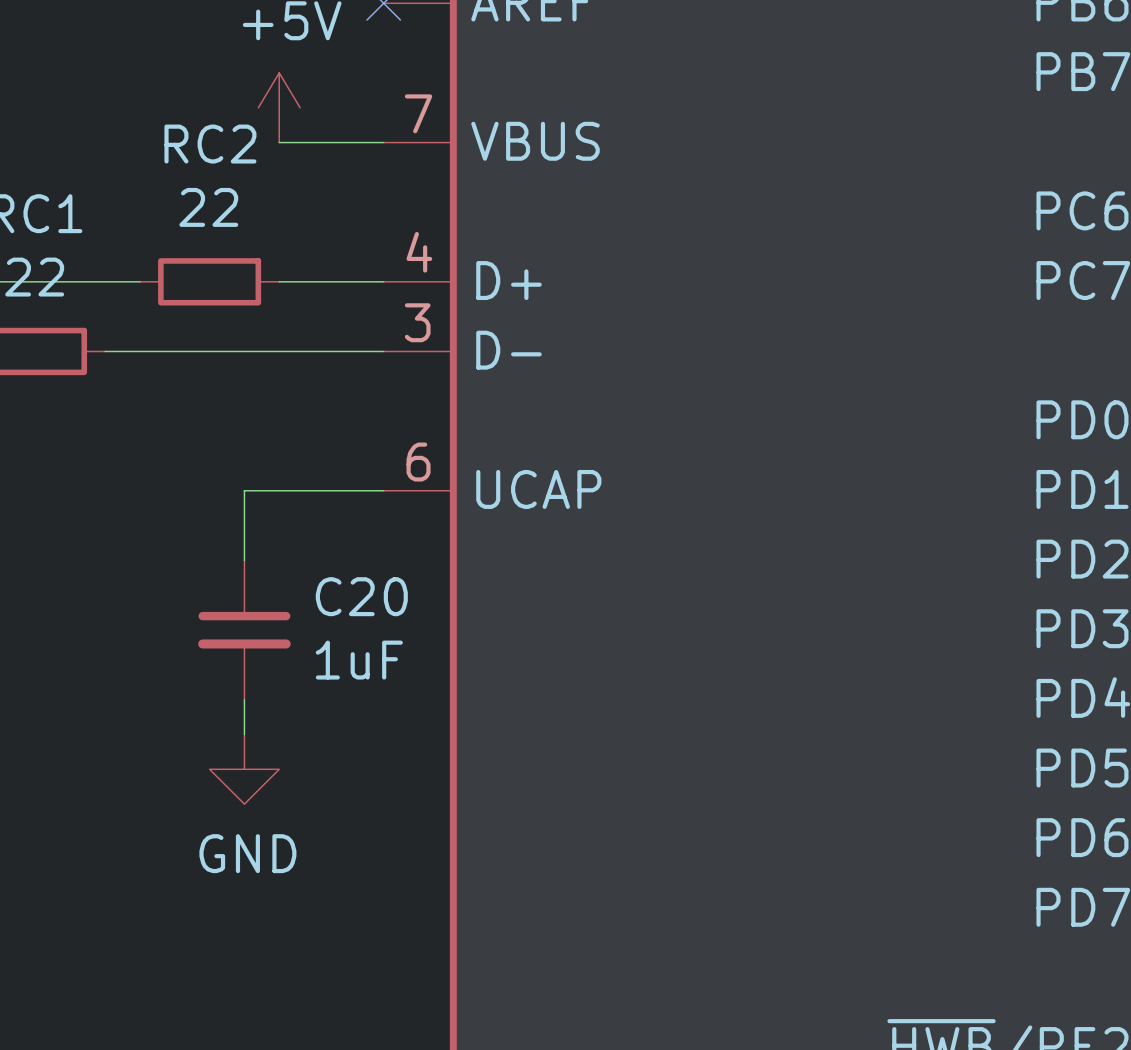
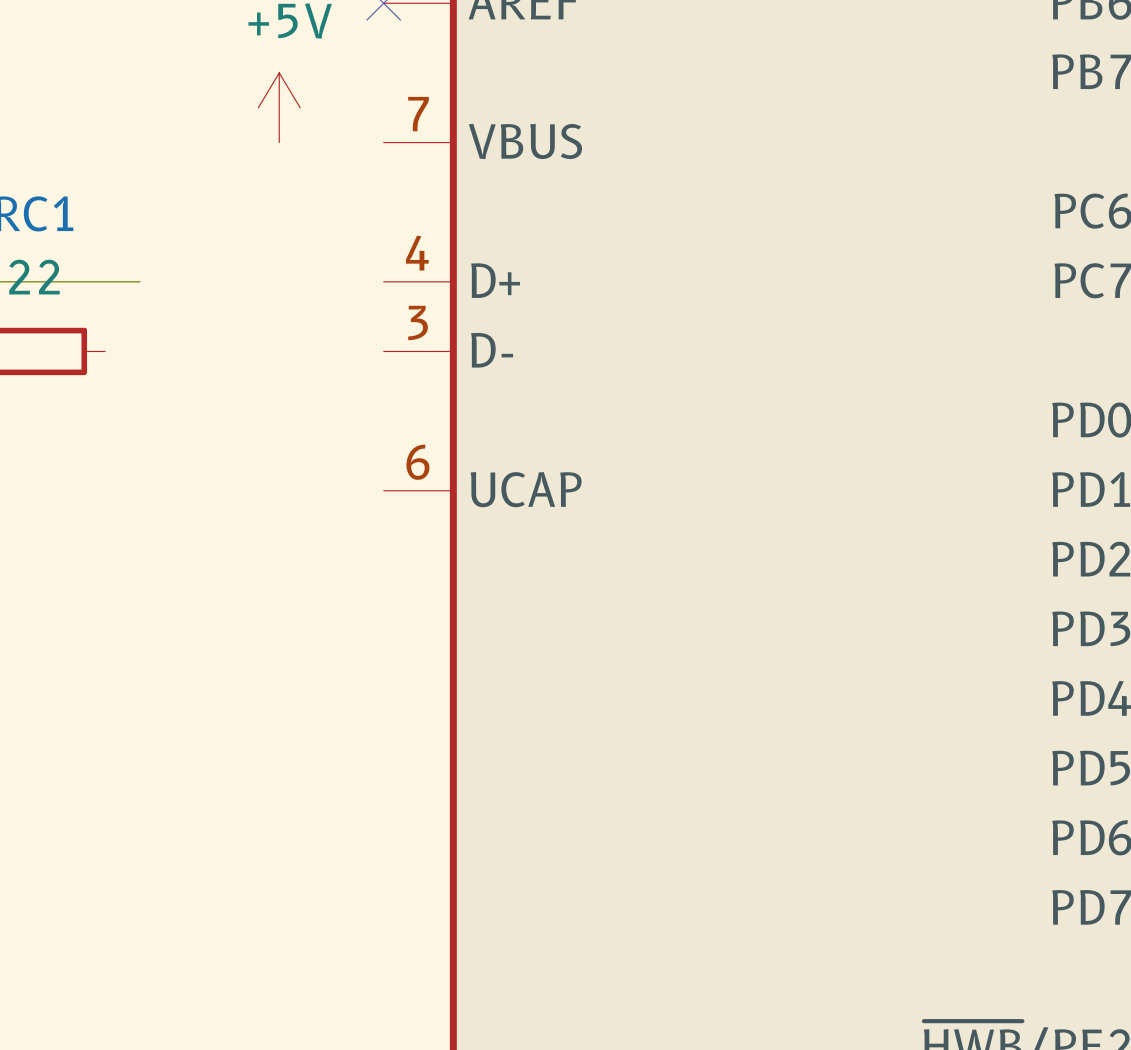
wire: (279, 142) (383, 142) -> none
RC2: 22 (209, 281) -> none
wire: (279, 281) (383, 281) -> none
wire: (105, 351) (383, 351) -> none
wire: (383, 490) (244, 490) (244, 560) -> none
C20: 1uF (244, 630) -> none
wire: (244, 699) (244, 734) -> none
power symbol: GND (244, 769) -> none

